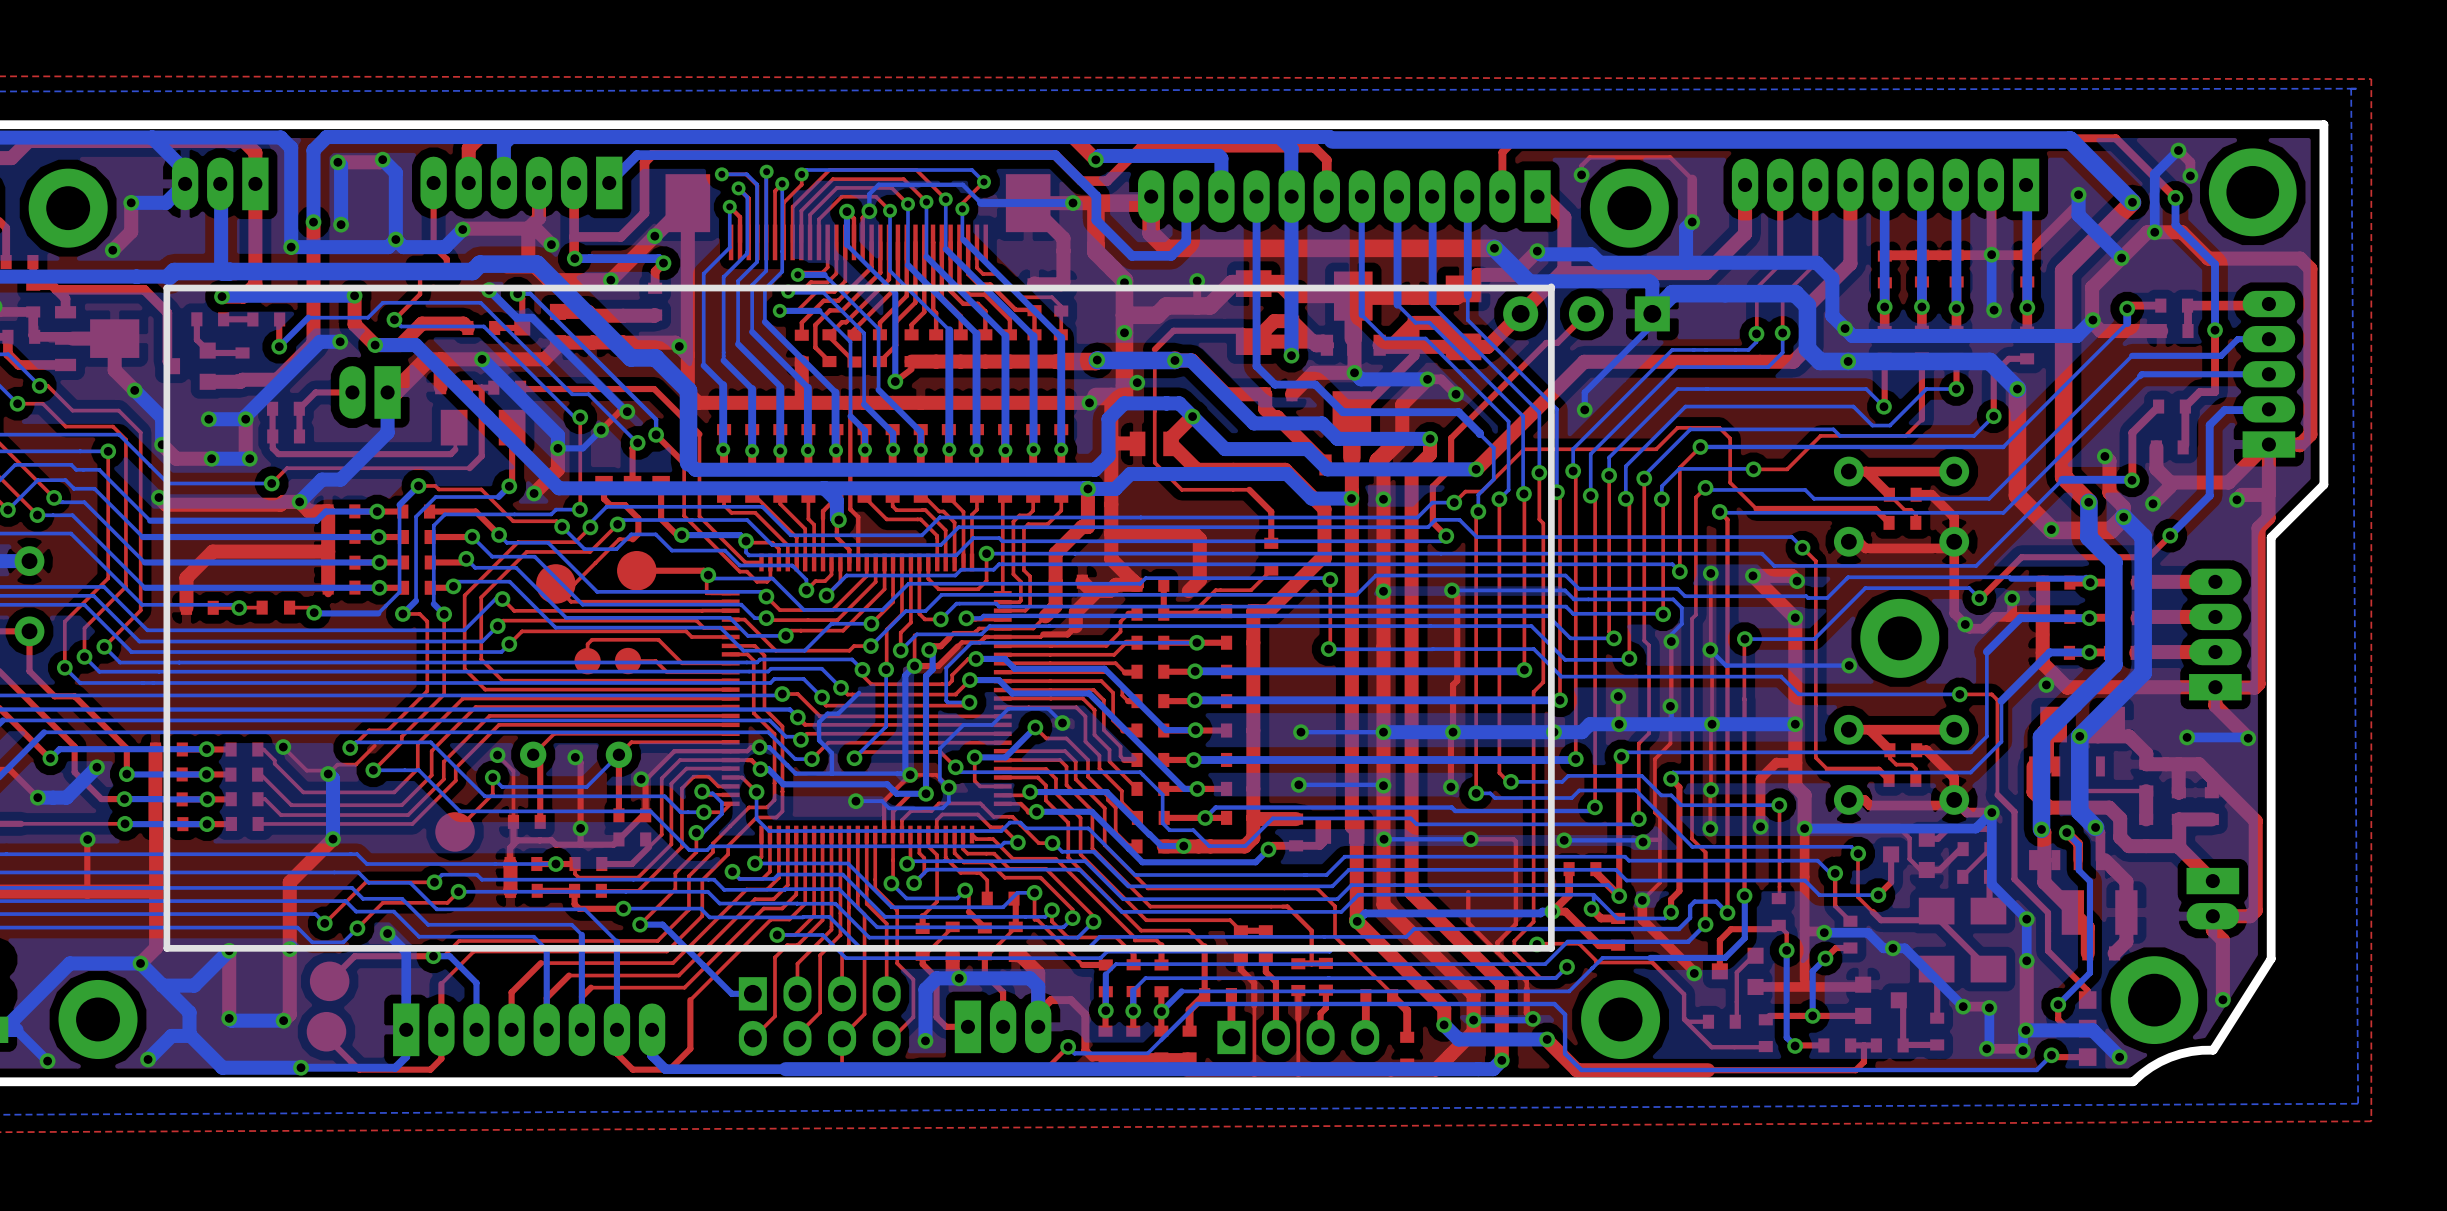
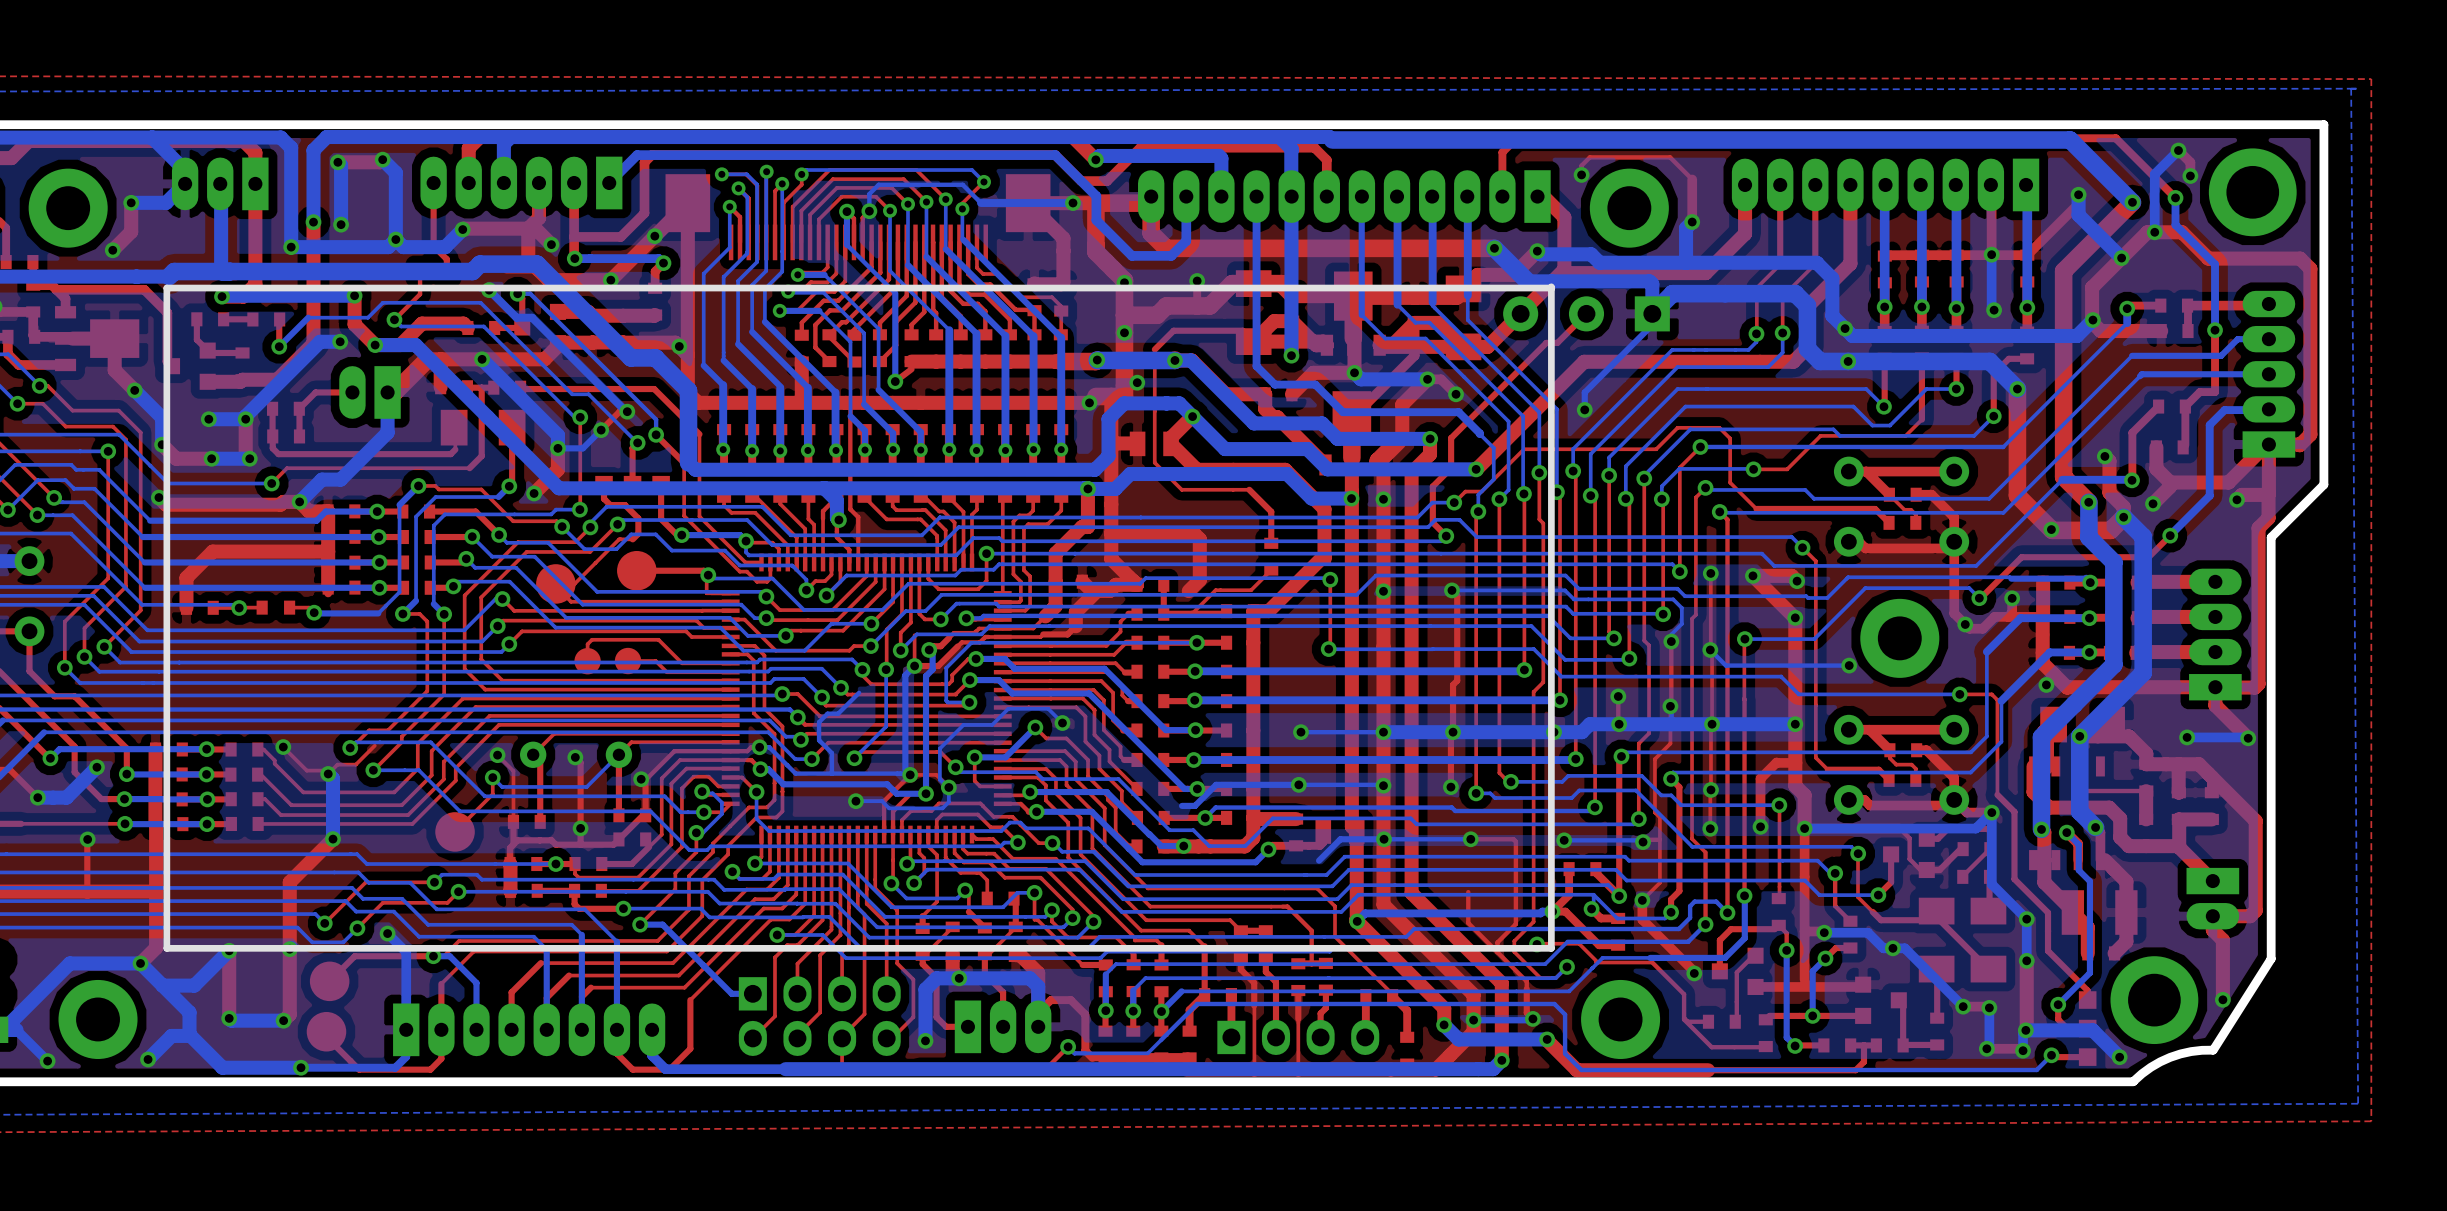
bottom track: (1035, 772) (1140, 772) (1162, 794) (1162, 823) -> (1035, 772) (1042, 779) (1118, 779) (1162, 823)
bottom track: none -> (1298, 784) (1216, 784) (1195, 805) (1182, 805)
bottom track: none -> (1384, 839) (1340, 839) (1319, 860)

